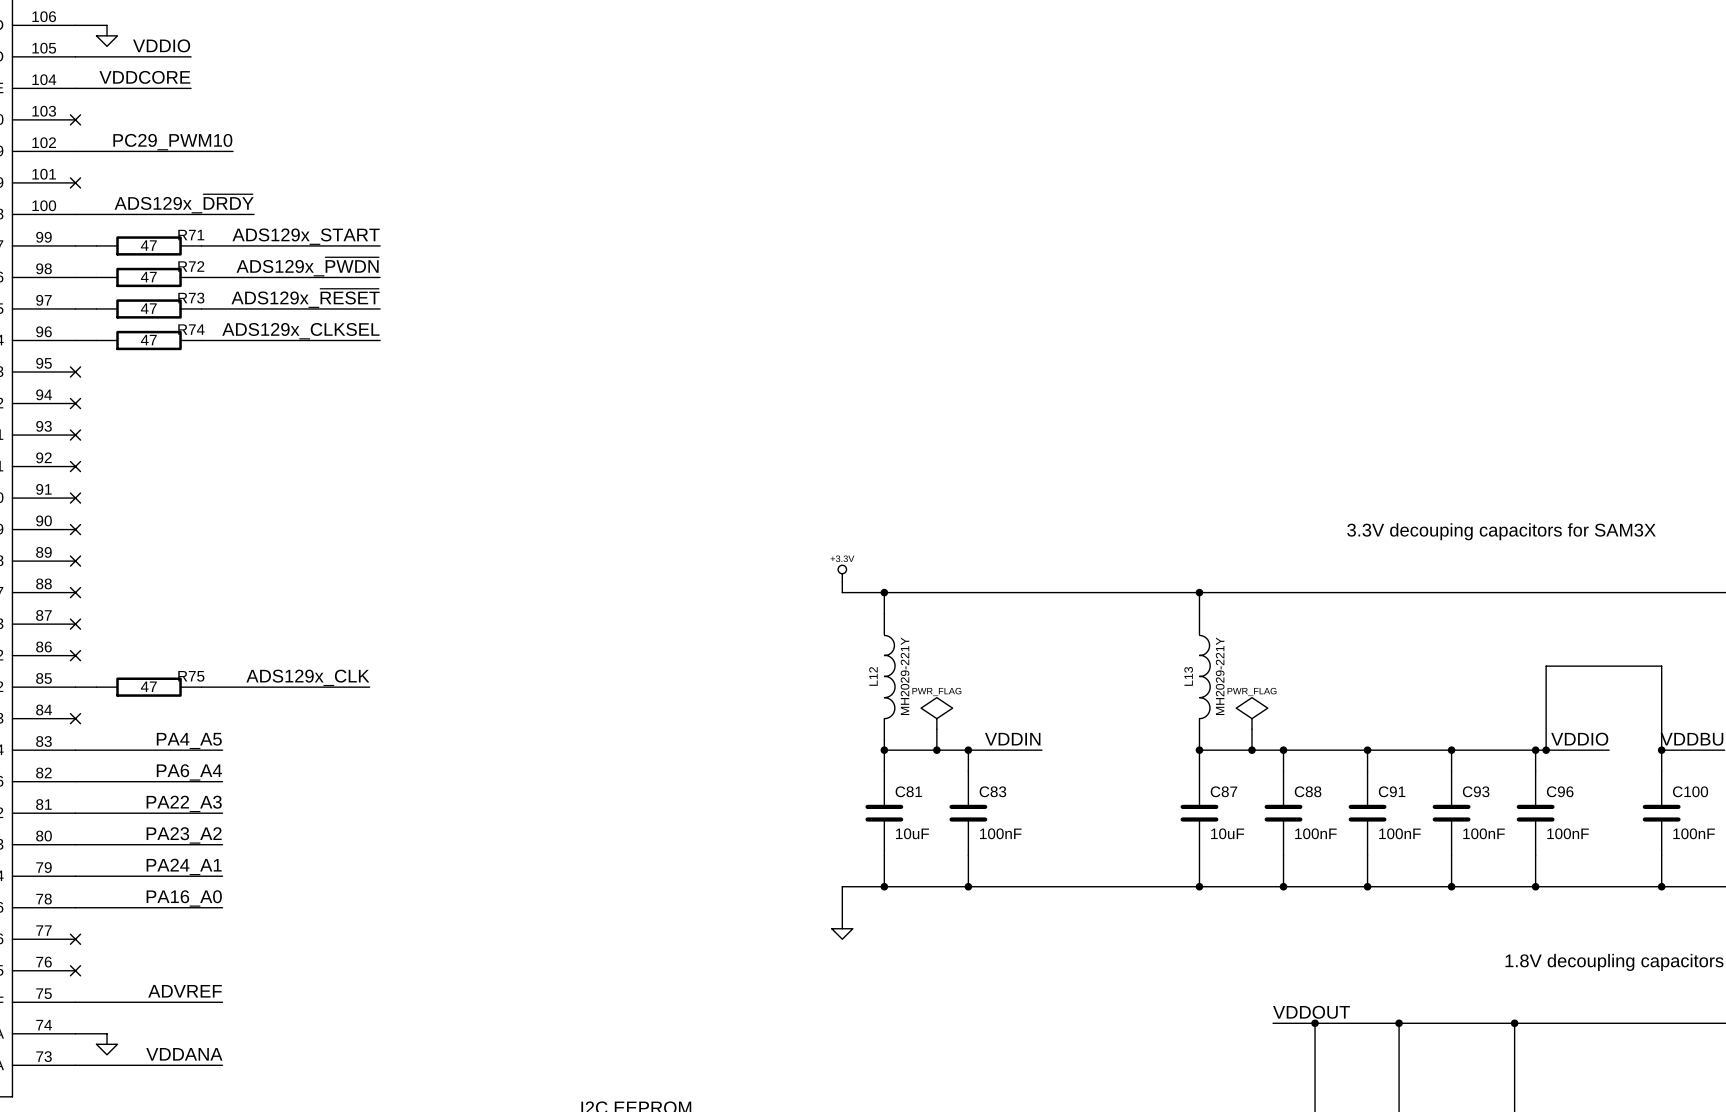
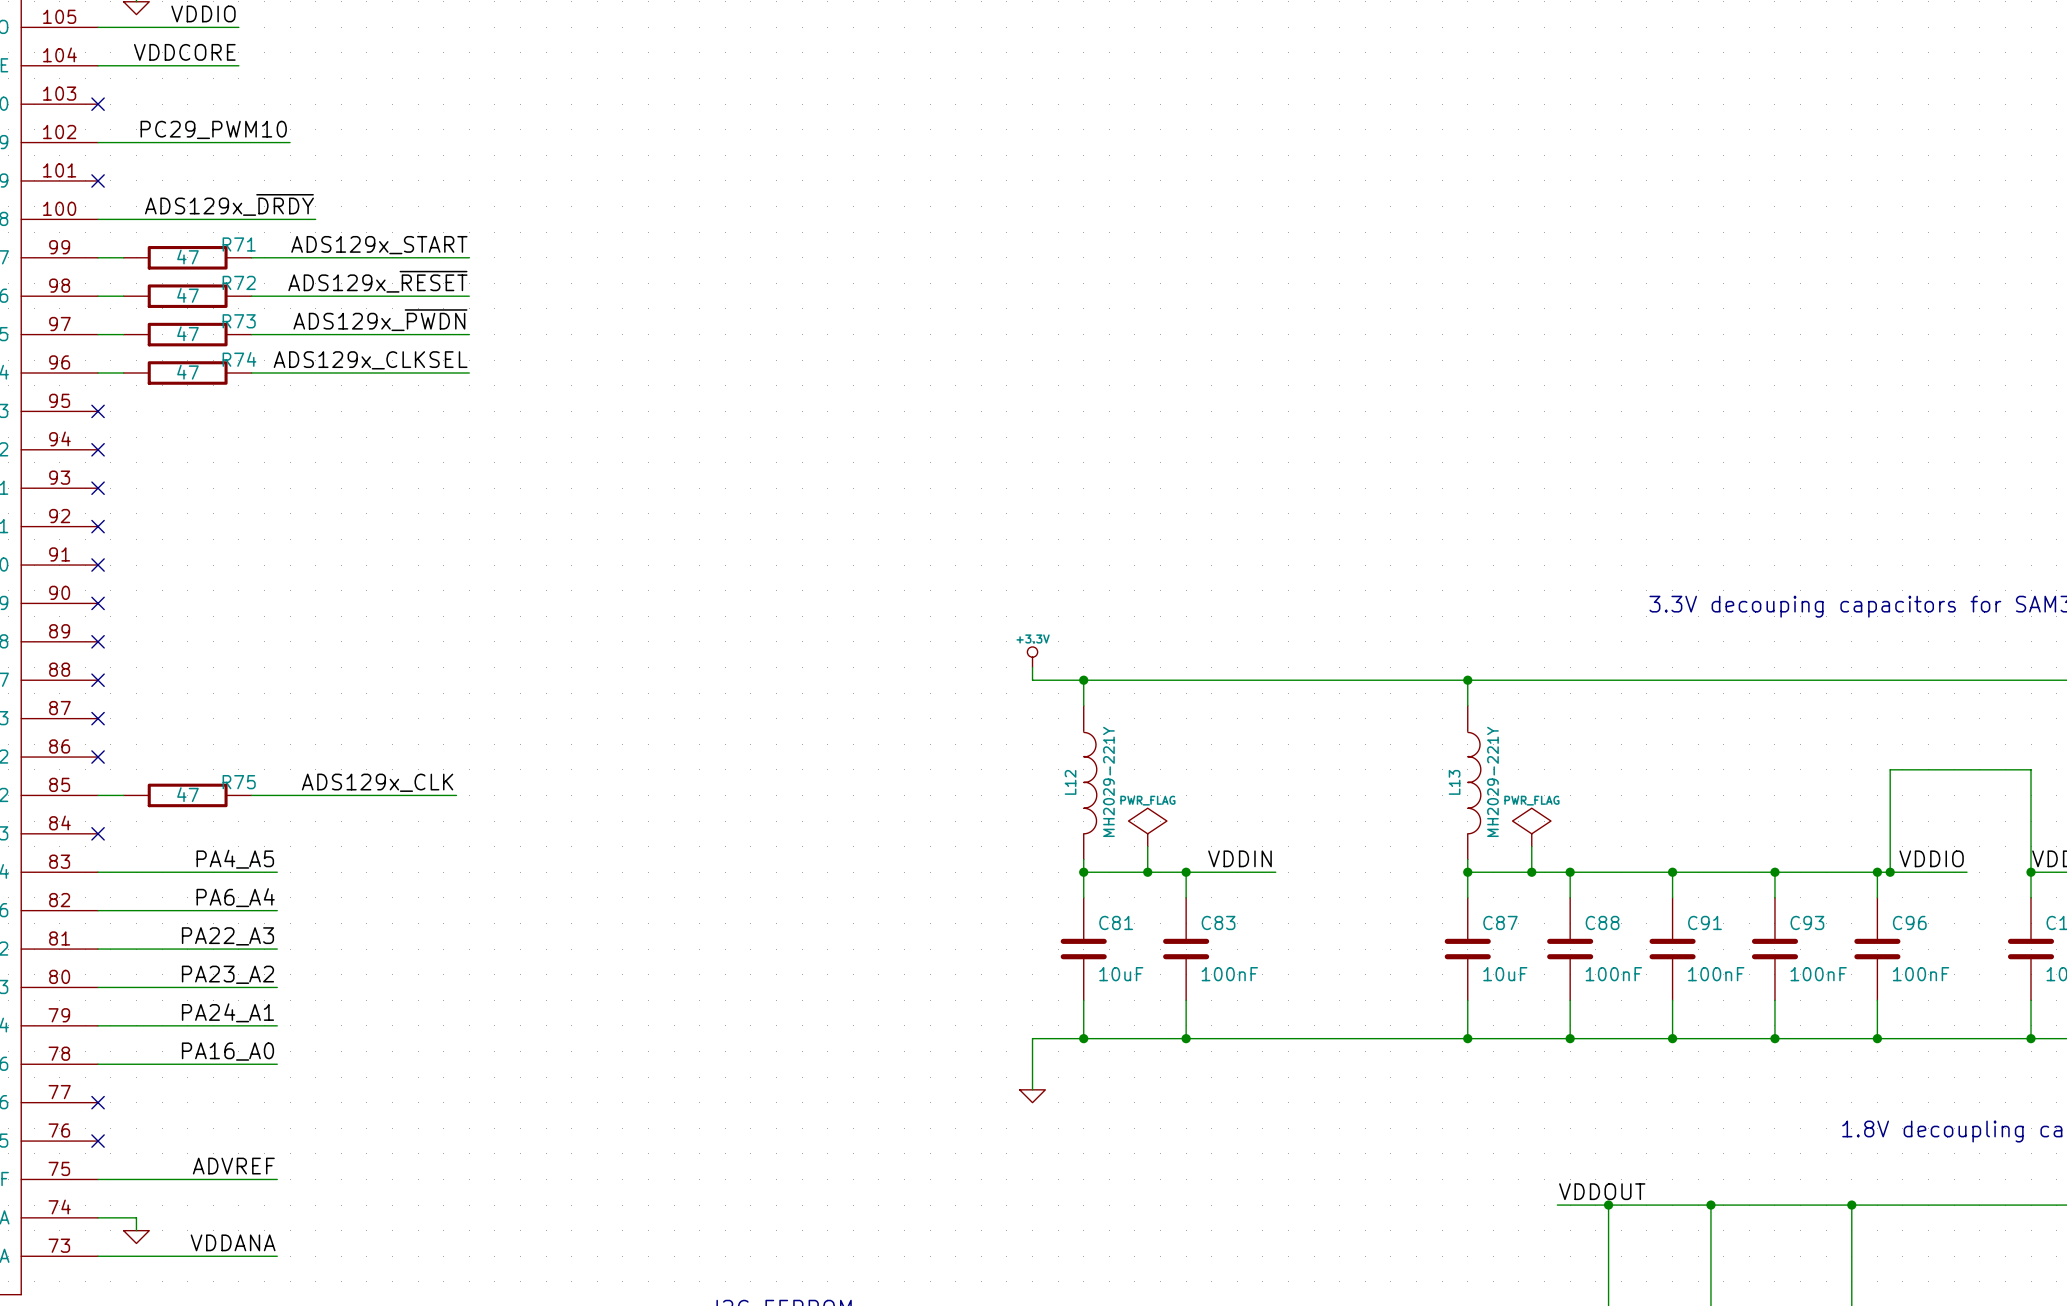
label: ADS129x_~{PWDN} (307, 266) -> ADS129x_~{RESET} (377, 281)
label: ADS129x_~{RESET} (305, 298) -> ADS129x_~{PWDN} (380, 320)

